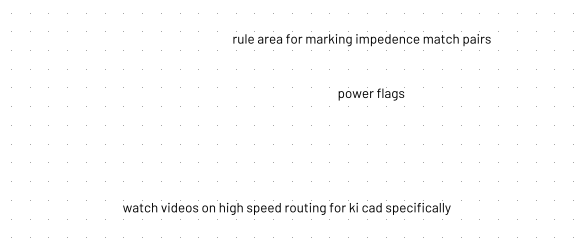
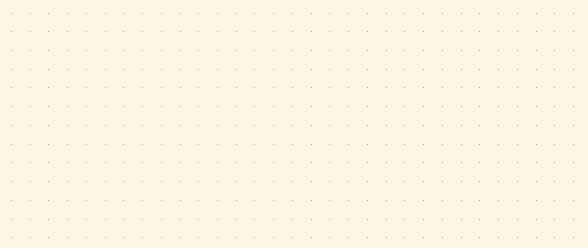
text: rule area for marking impedence match pairs (362, 40) -> none
text: power flags (371, 94) -> none
text: watch videos on high speed routing for ki cad specifically (286, 208) -> none

